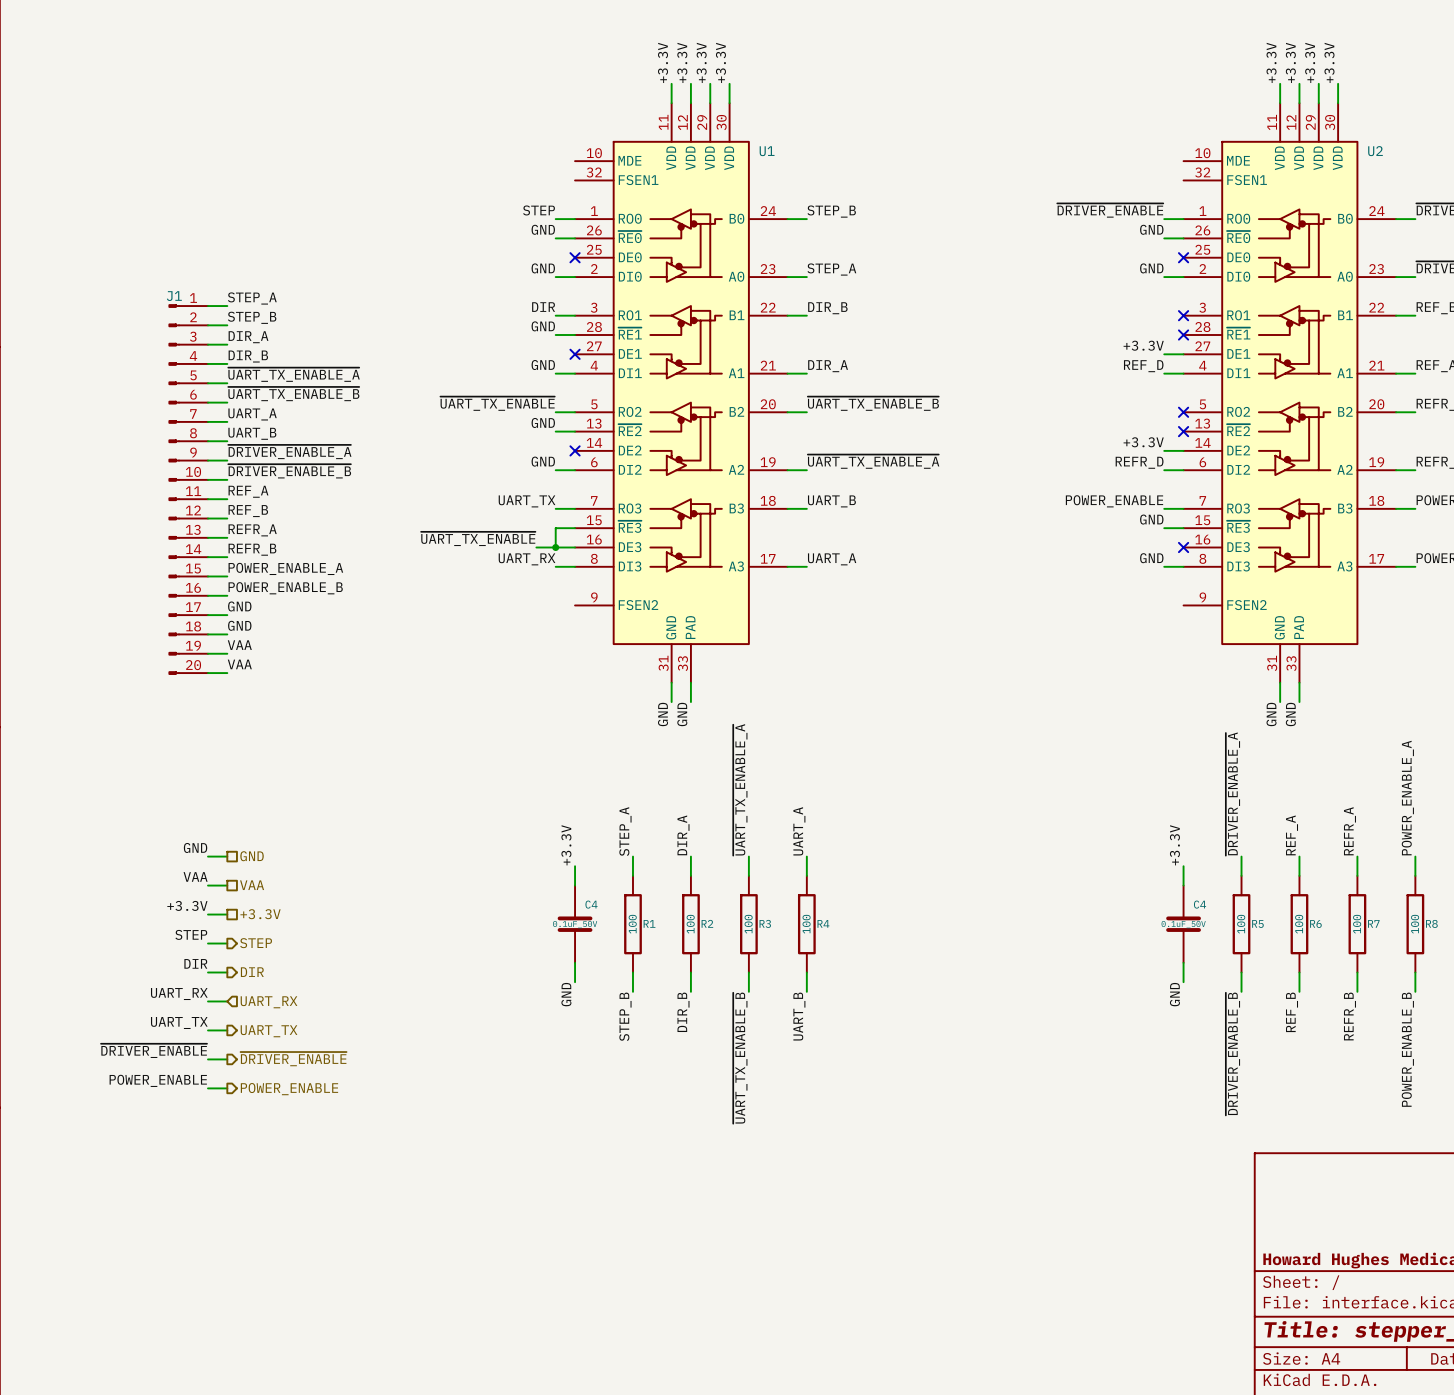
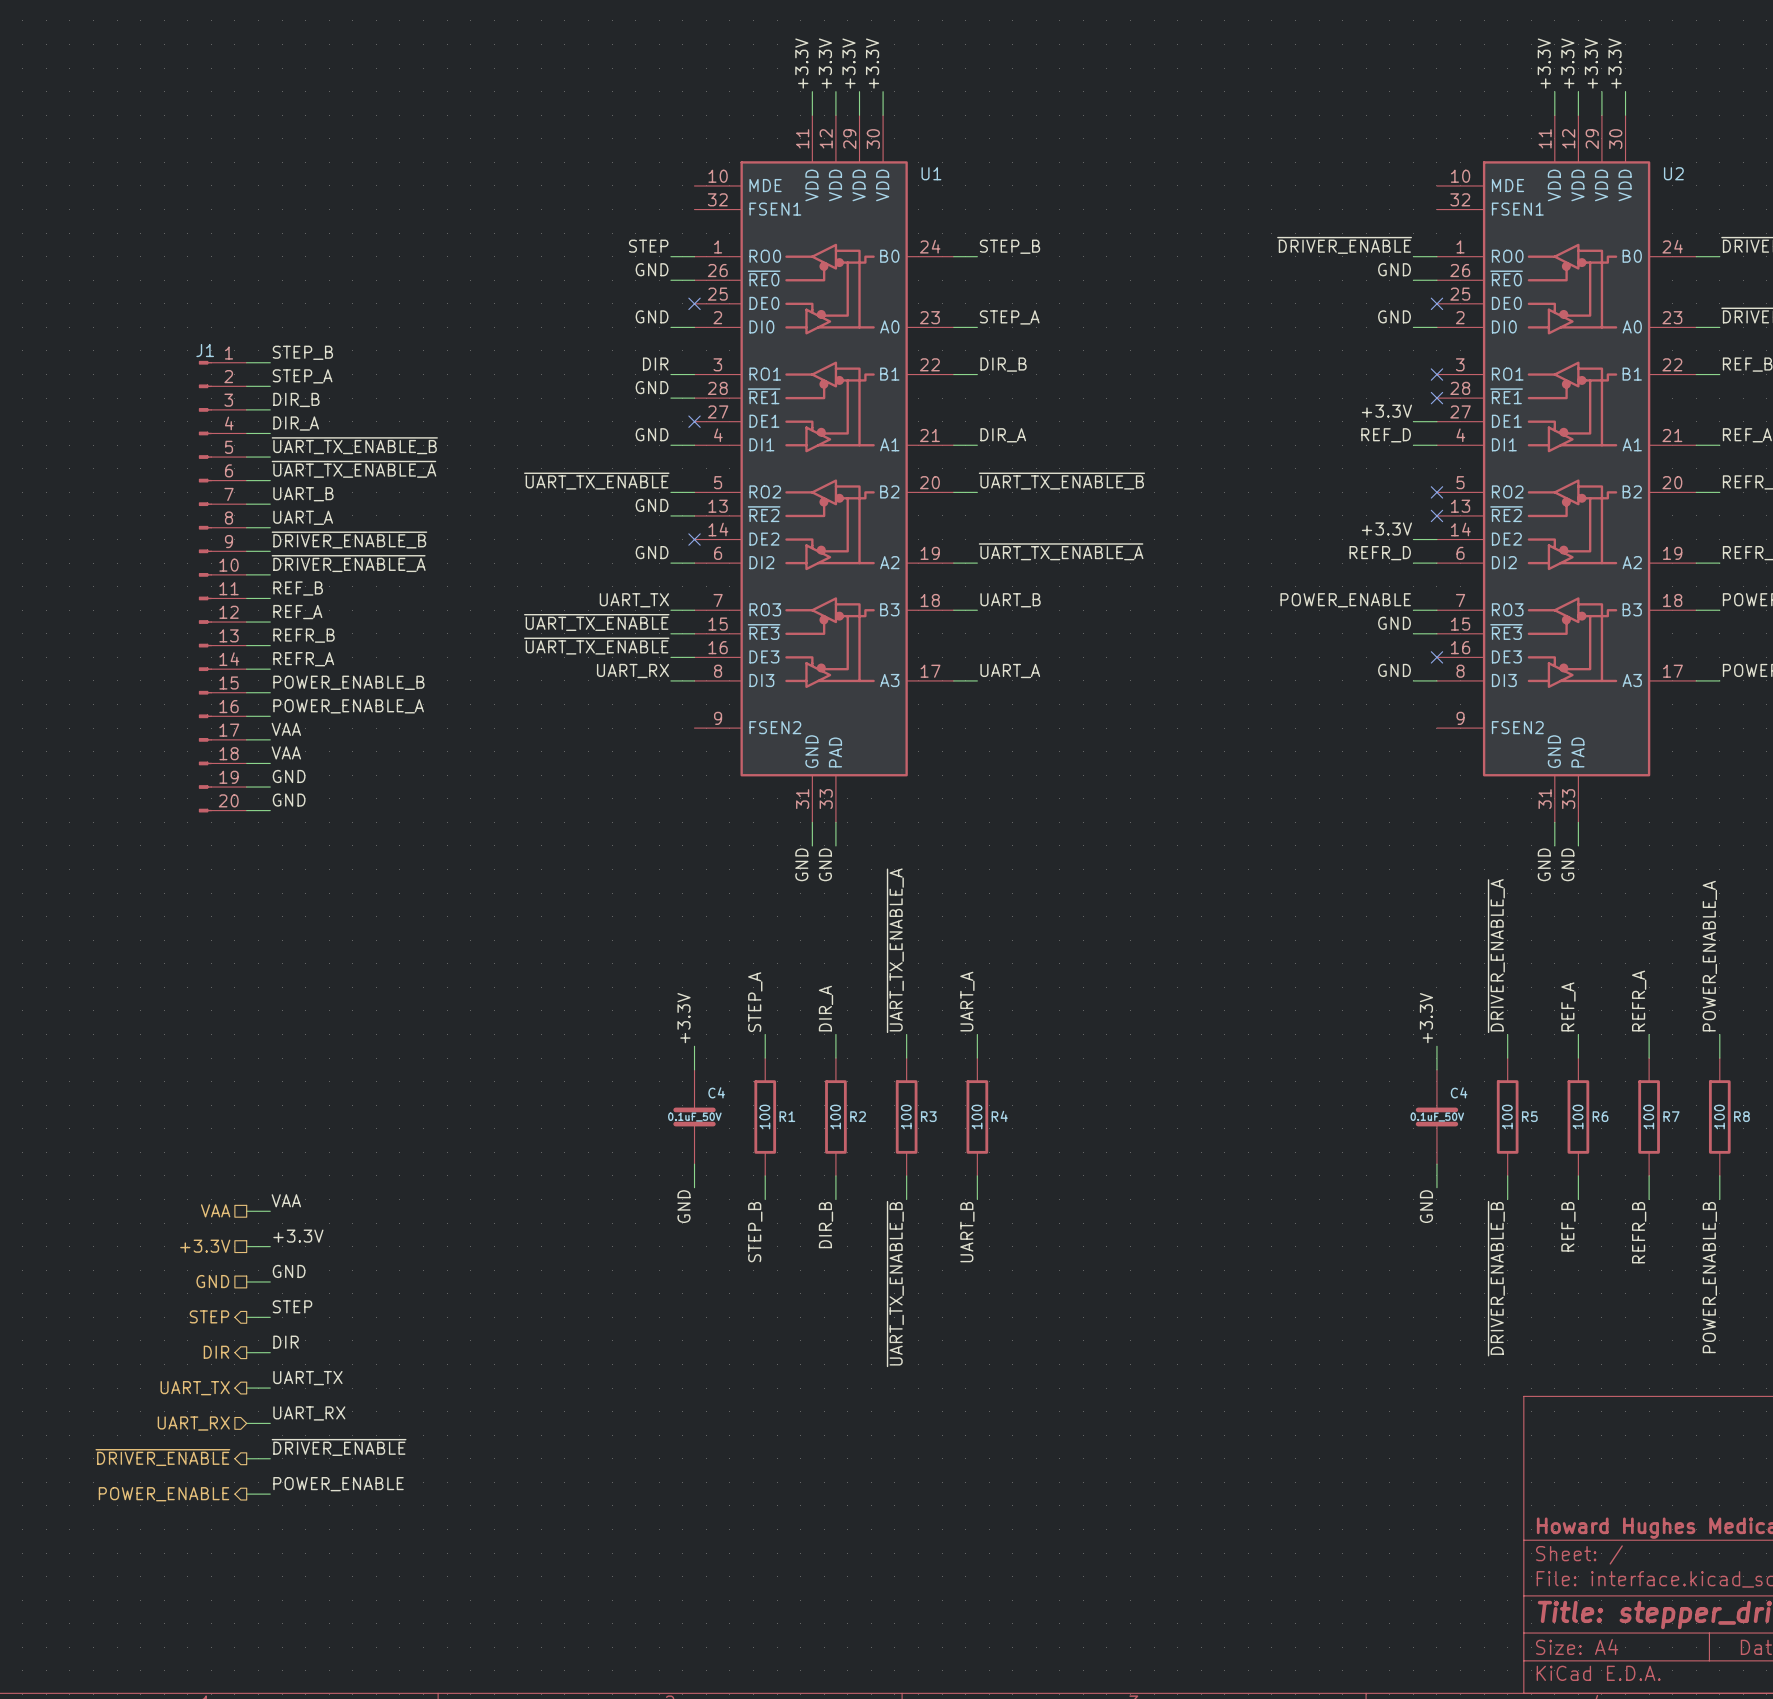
label: STEP_A (252, 298) -> STEP_B (302, 352)
label: STEP_B (252, 317) -> STEP_A (302, 376)
label: DIR_A (248, 337) -> DIR_B (296, 399)
label: DIR_B (248, 356) -> DIR_A (296, 423)
label: ~{UART_TX_ENABLE_A} (294, 374) -> ~{UART_TX_ENABLE_B} (354, 445)
label: ~{UART_TX_ENABLE_B} (293, 394) -> ~{UART_TX_ENABLE_A} (353, 469)
label: UART_A (252, 414) -> UART_B (303, 494)
label: UART_B (252, 433) -> UART_A (303, 517)
label: ~{DRIVER_ENABLE_A} (289, 452) -> ~{DRIVER_ENABLE_B} (349, 540)
label: ~{DRIVER_ENABLE_B} (289, 471) -> ~{DRIVER_ENABLE_A} (348, 563)
label: REF_A (248, 491) -> REF_B (298, 588)
label: REF_B (248, 511) -> REF_A (297, 612)
label: none -> ~{UART_TX_ENABLE} (596, 622)
wire: (555, 528) (555, 547) (536, 547) -> none
label: REFR_A (252, 530) -> REFR_B (304, 635)
label: ~{UART_TX_ENABLE} (478, 538) -> none
label: none -> ~{UART_TX_ENABLE} (596, 646)
junction: (555, 547) -> none
label: REFR_B (252, 549) -> REFR_A (303, 659)
label: POWER_ENABLE_A (285, 568) -> POWER_ENABLE_B (348, 682)
label: POWER_ENABLE_B (285, 588) -> POWER_ENABLE_A (348, 706)
label: GND (239, 606) -> VAA (286, 729)
label: GND (239, 625) -> VAA (286, 752)
label: VAA (239, 645) -> GND (289, 776)
label: VAA (239, 664) -> GND (289, 800)
label: GND (195, 847) -> none
wire: (207, 856) (227, 856) -> none
hierarchical label: GND (252, 856) -> none
label position: VAA (195, 876) -> VAA (286, 1200)
wire: (207, 885) (227, 885) -> none
hierarchical label rotation: 0° (252, 885) -> 180° (215, 1210)
hierarchical label position: VAA (252, 885) -> VAA (215, 1210)
label position: +3.3V (187, 905) -> +3.3V (298, 1236)
wire: (207, 914) (227, 914) -> none
hierarchical label rotation: 0° (260, 914) -> 180° (205, 1246)
hierarchical label position: +3.3V (260, 914) -> +3.3V (205, 1246)
label position: STEP (191, 934) -> STEP (292, 1306)
wire: (207, 943) (227, 943) -> (246, 1352) (270, 1352)
hierarchical label rotation: 0° (256, 943) -> 180° (209, 1316)
hierarchical label position: STEP (256, 943) -> STEP (209, 1316)
label position: DIR (195, 963) -> DIR (286, 1342)
wire: (207, 972) (227, 972) -> (246, 1388) (270, 1388)
hierarchical label rotation: 0° (252, 972) -> 180° (216, 1352)
hierarchical label position: DIR (252, 972) -> DIR (216, 1352)
label position: UART_RX (179, 994) -> UART_RX (309, 1413)
hierarchical label rotation: 0° (269, 1002) -> 180° (193, 1423)
hierarchical label position: UART_RX (269, 1002) -> UART_RX (193, 1423)
label position: UART_TX (179, 1023) -> UART_TX (307, 1378)
hierarchical label rotation: 0° (269, 1031) -> 180° (195, 1388)
hierarchical label position: UART_TX (269, 1031) -> UART_TX (195, 1388)
label position: ~{DRIVER_ENABLE} (154, 1050) -> ~{DRIVER_ENABLE} (339, 1447)
label: none -> GND (289, 1271)
hierarchical label: none -> GND (212, 1281)
hierarchical label rotation: 0° (293, 1059) -> 180° (162, 1457)
hierarchical label position: ~{DRIVER_ENABLE} (293, 1059) -> ~{DRIVER_ENABLE} (162, 1457)
label position: POWER_ENABLE (158, 1080) -> POWER_ENABLE (338, 1484)
hierarchical label rotation: 0° (289, 1089) -> 180° (164, 1494)
hierarchical label position: POWER_ENABLE (289, 1089) -> POWER_ENABLE (164, 1494)
wire: none -> (246, 1423) (270, 1423)
wire: none -> (246, 1458) (270, 1458)
wire: none -> (246, 1494) (270, 1494)

